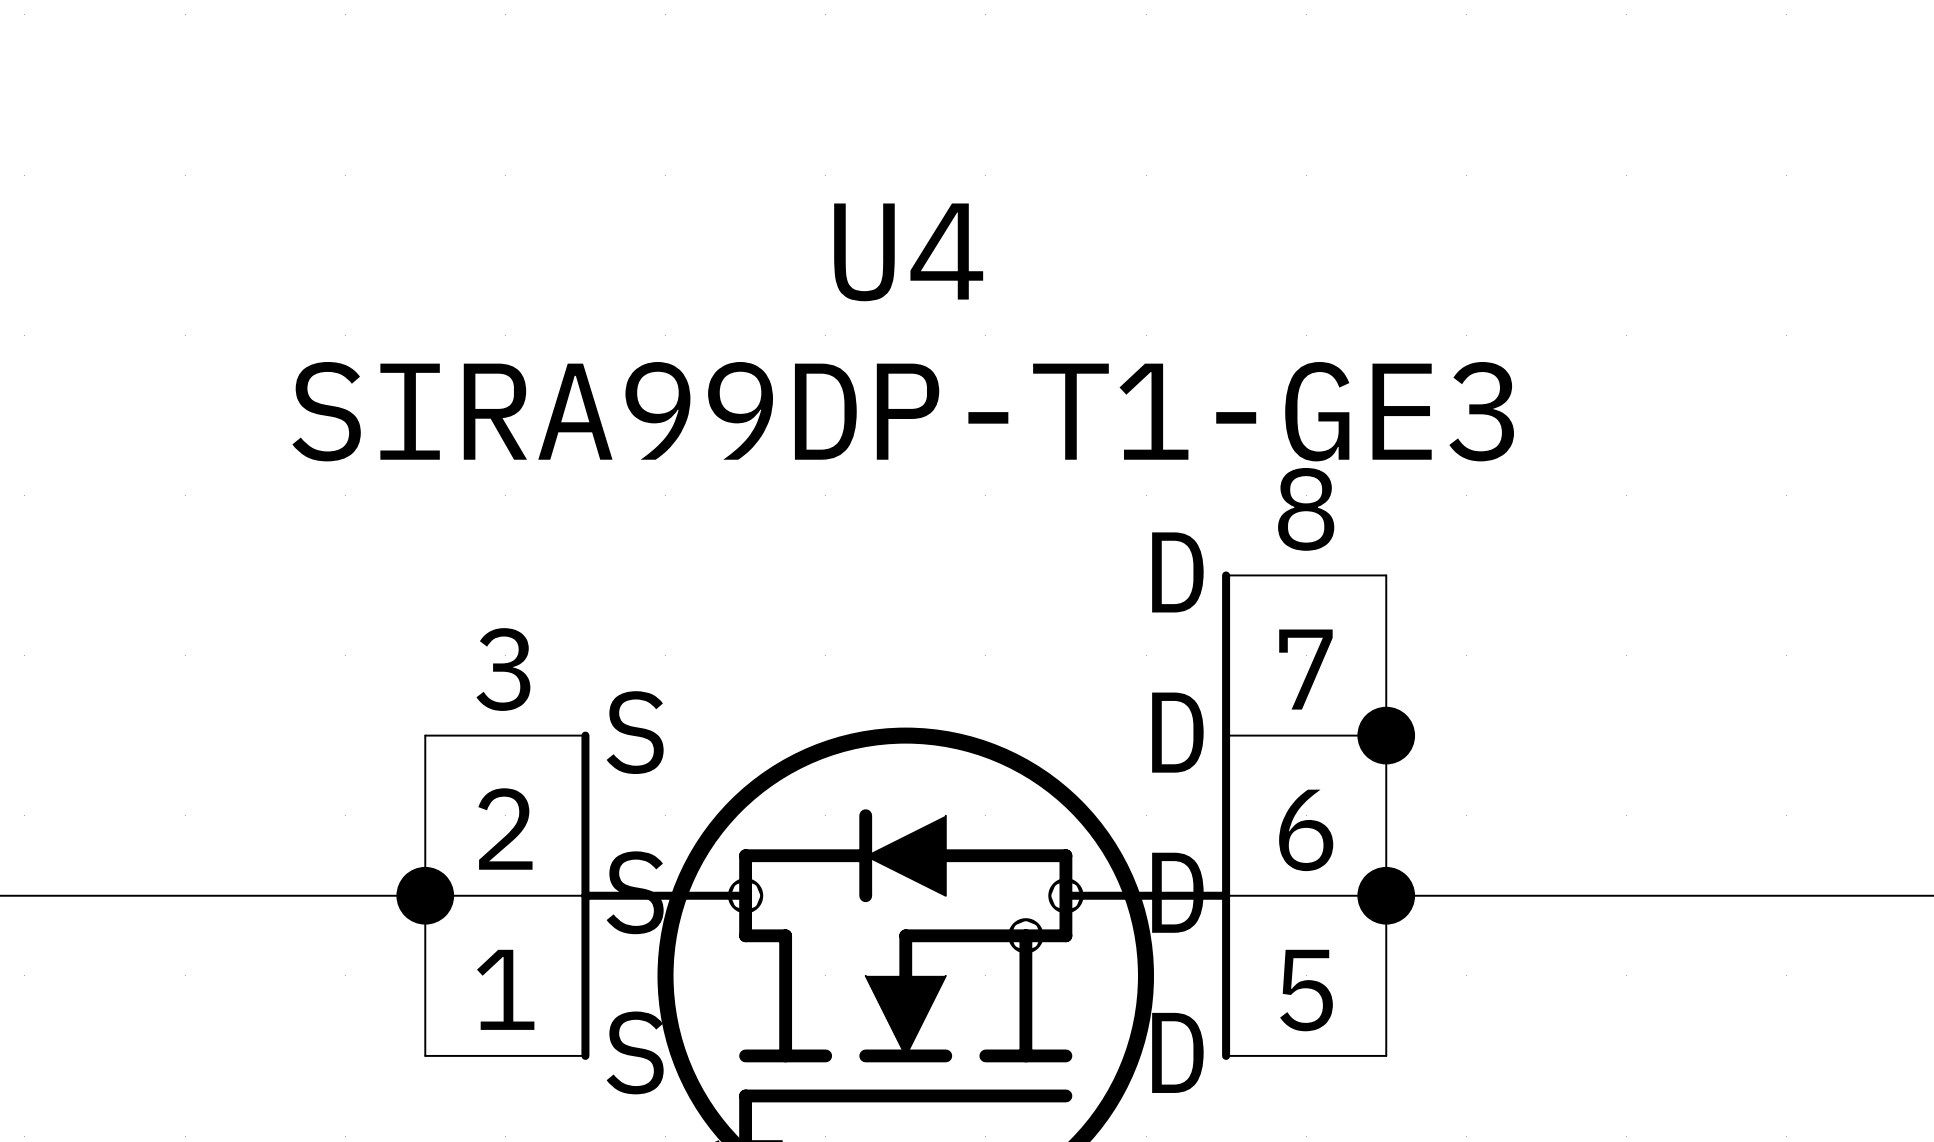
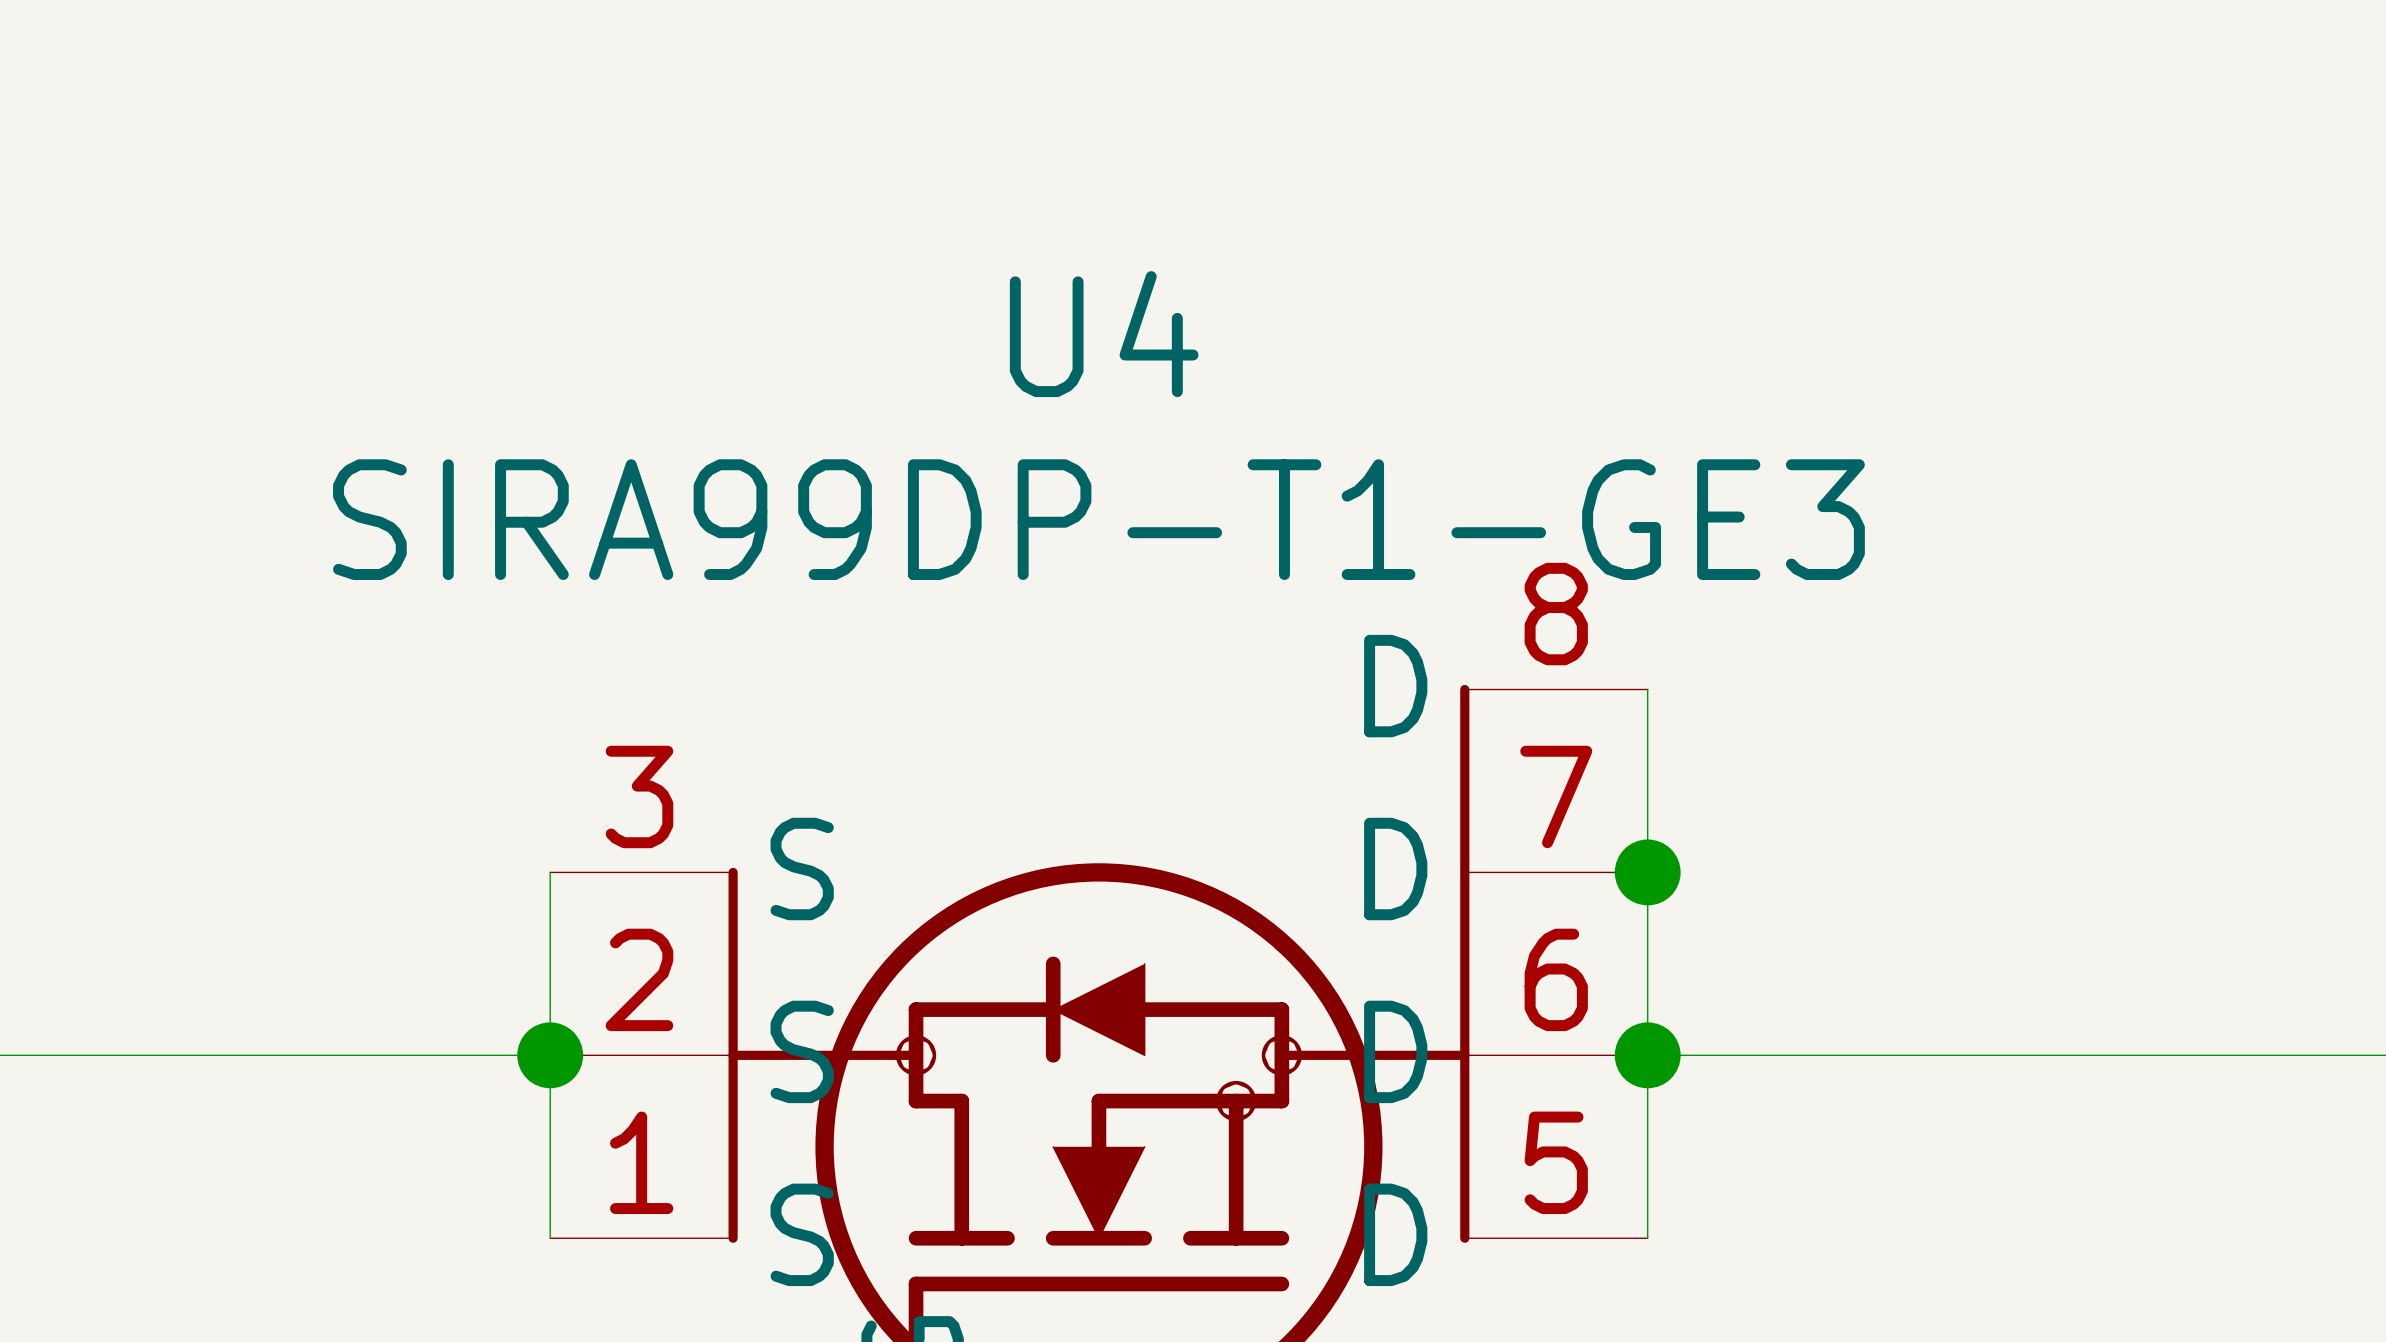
U4 name position: U4 (908, 252) -> U4 (1104, 334)
U4 value position: SIRA99DP-T1-GE3 (903, 411) -> SIRA99DP-T1-GE3 (1098, 519)

